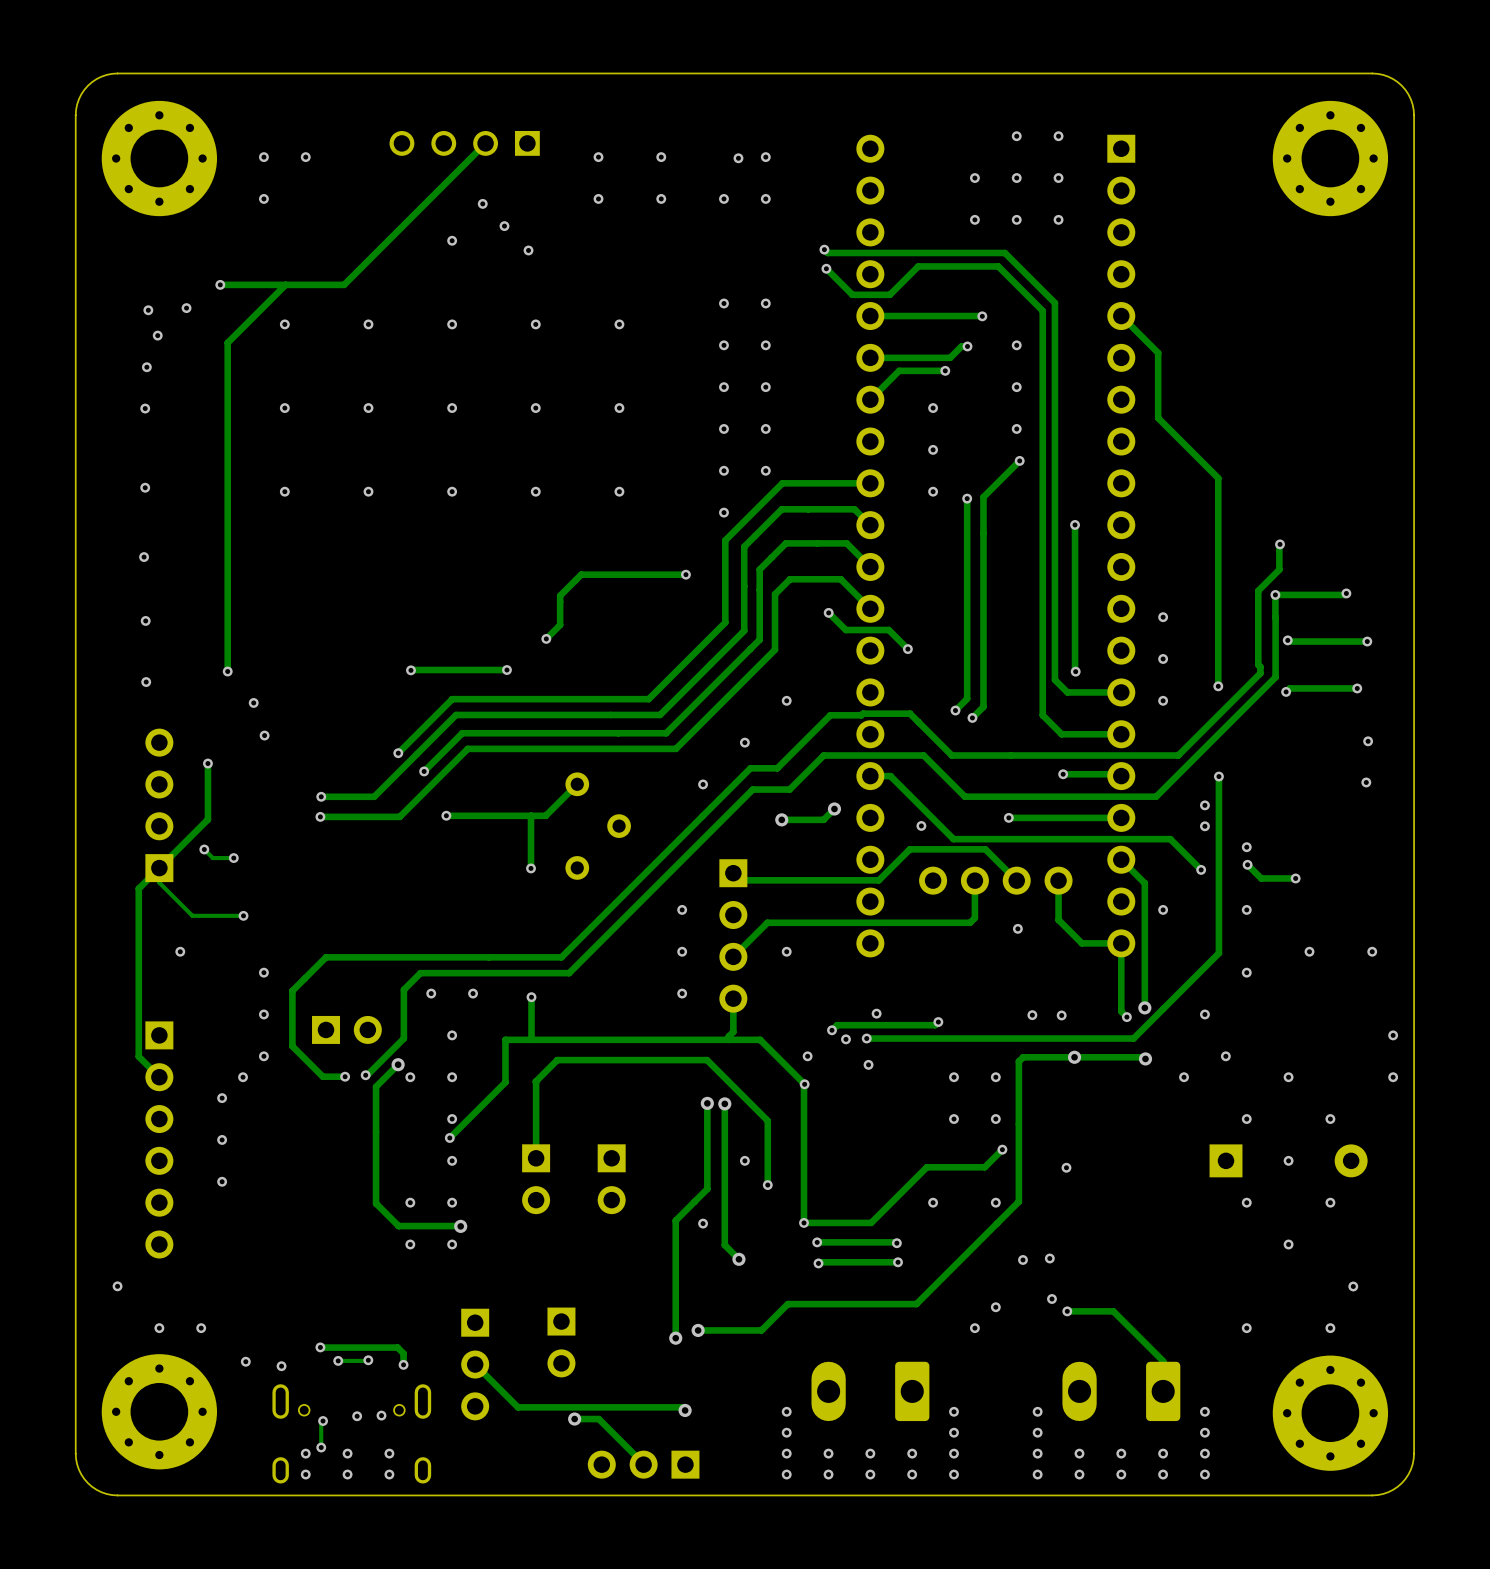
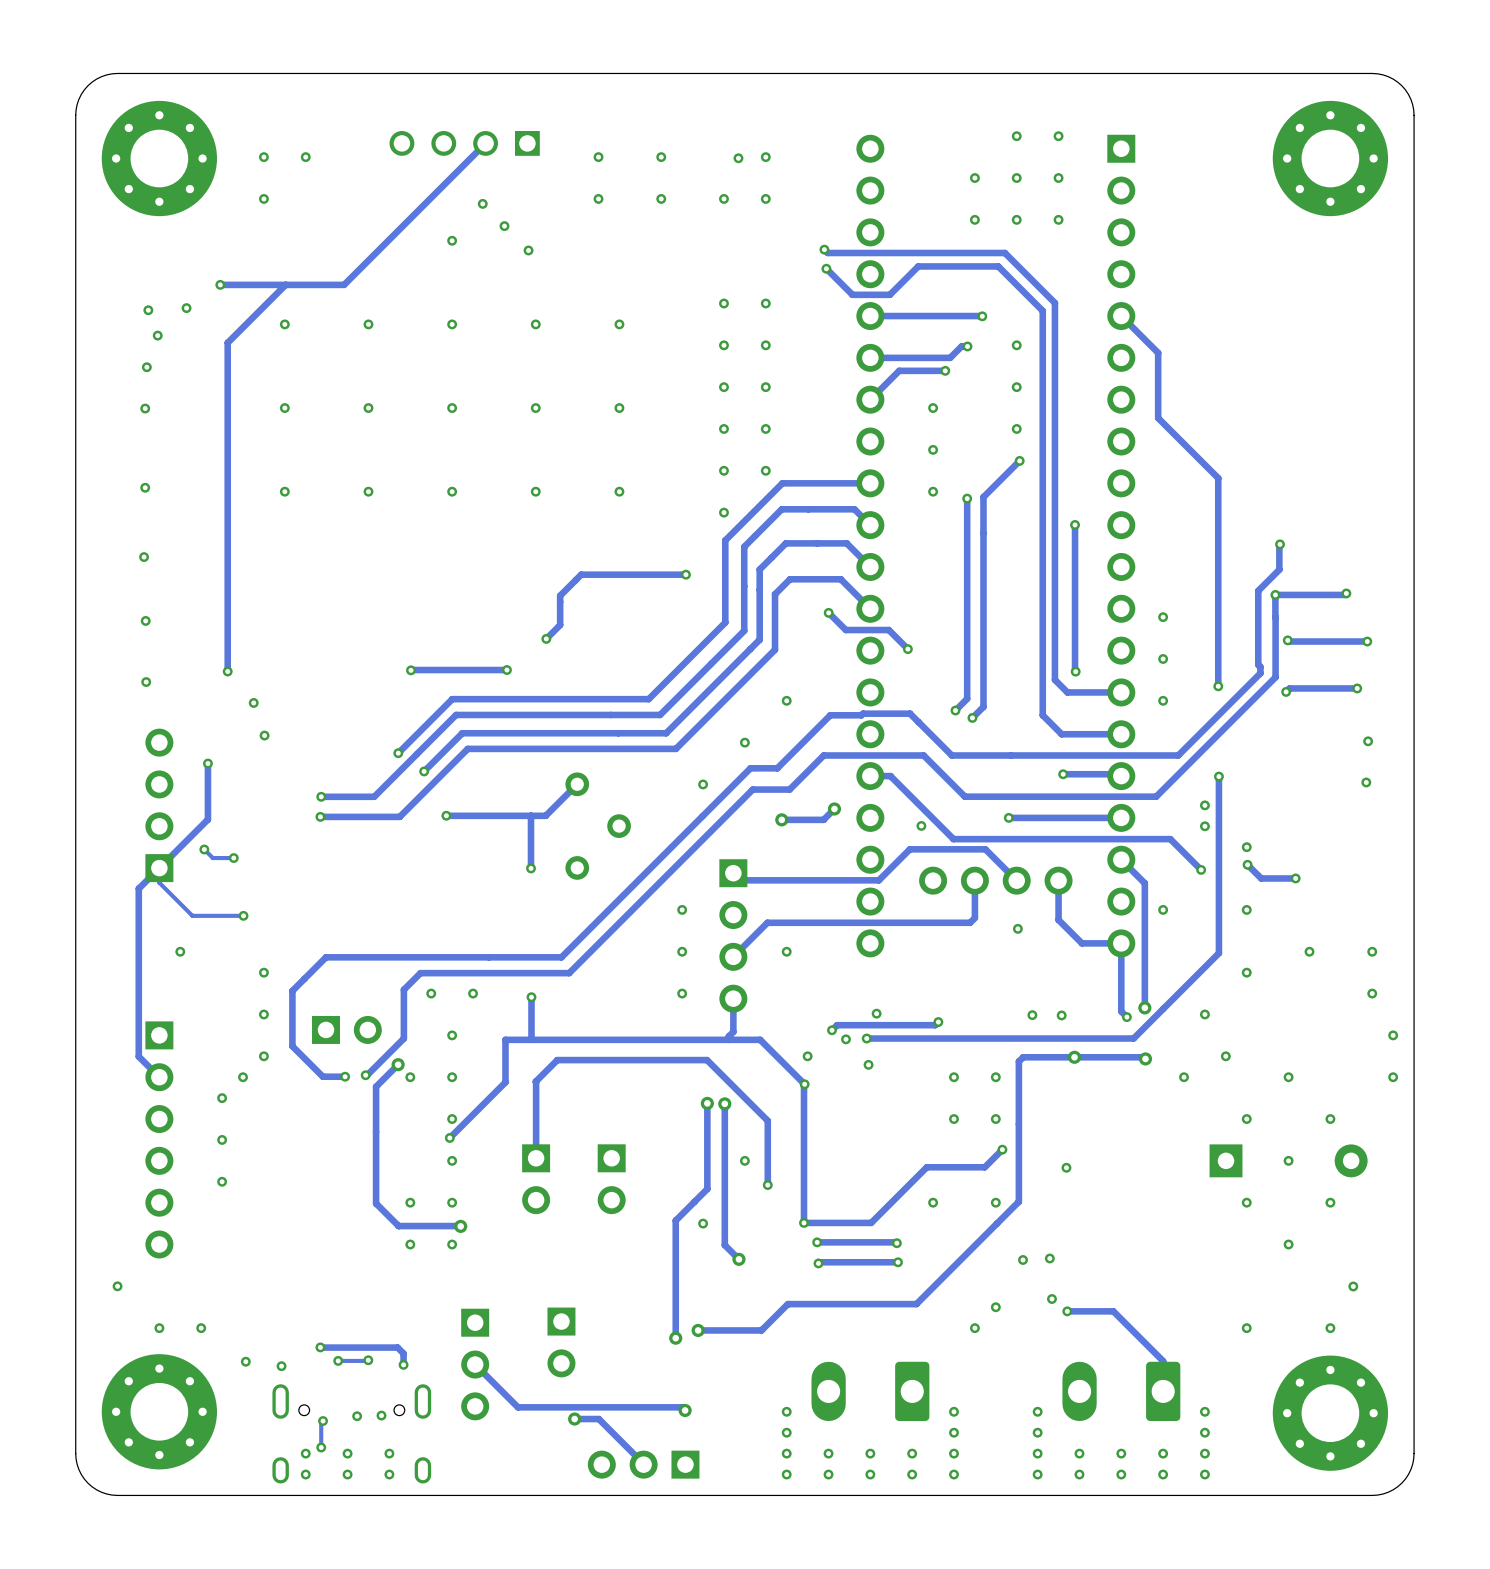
via: none -> (1372, 993)

